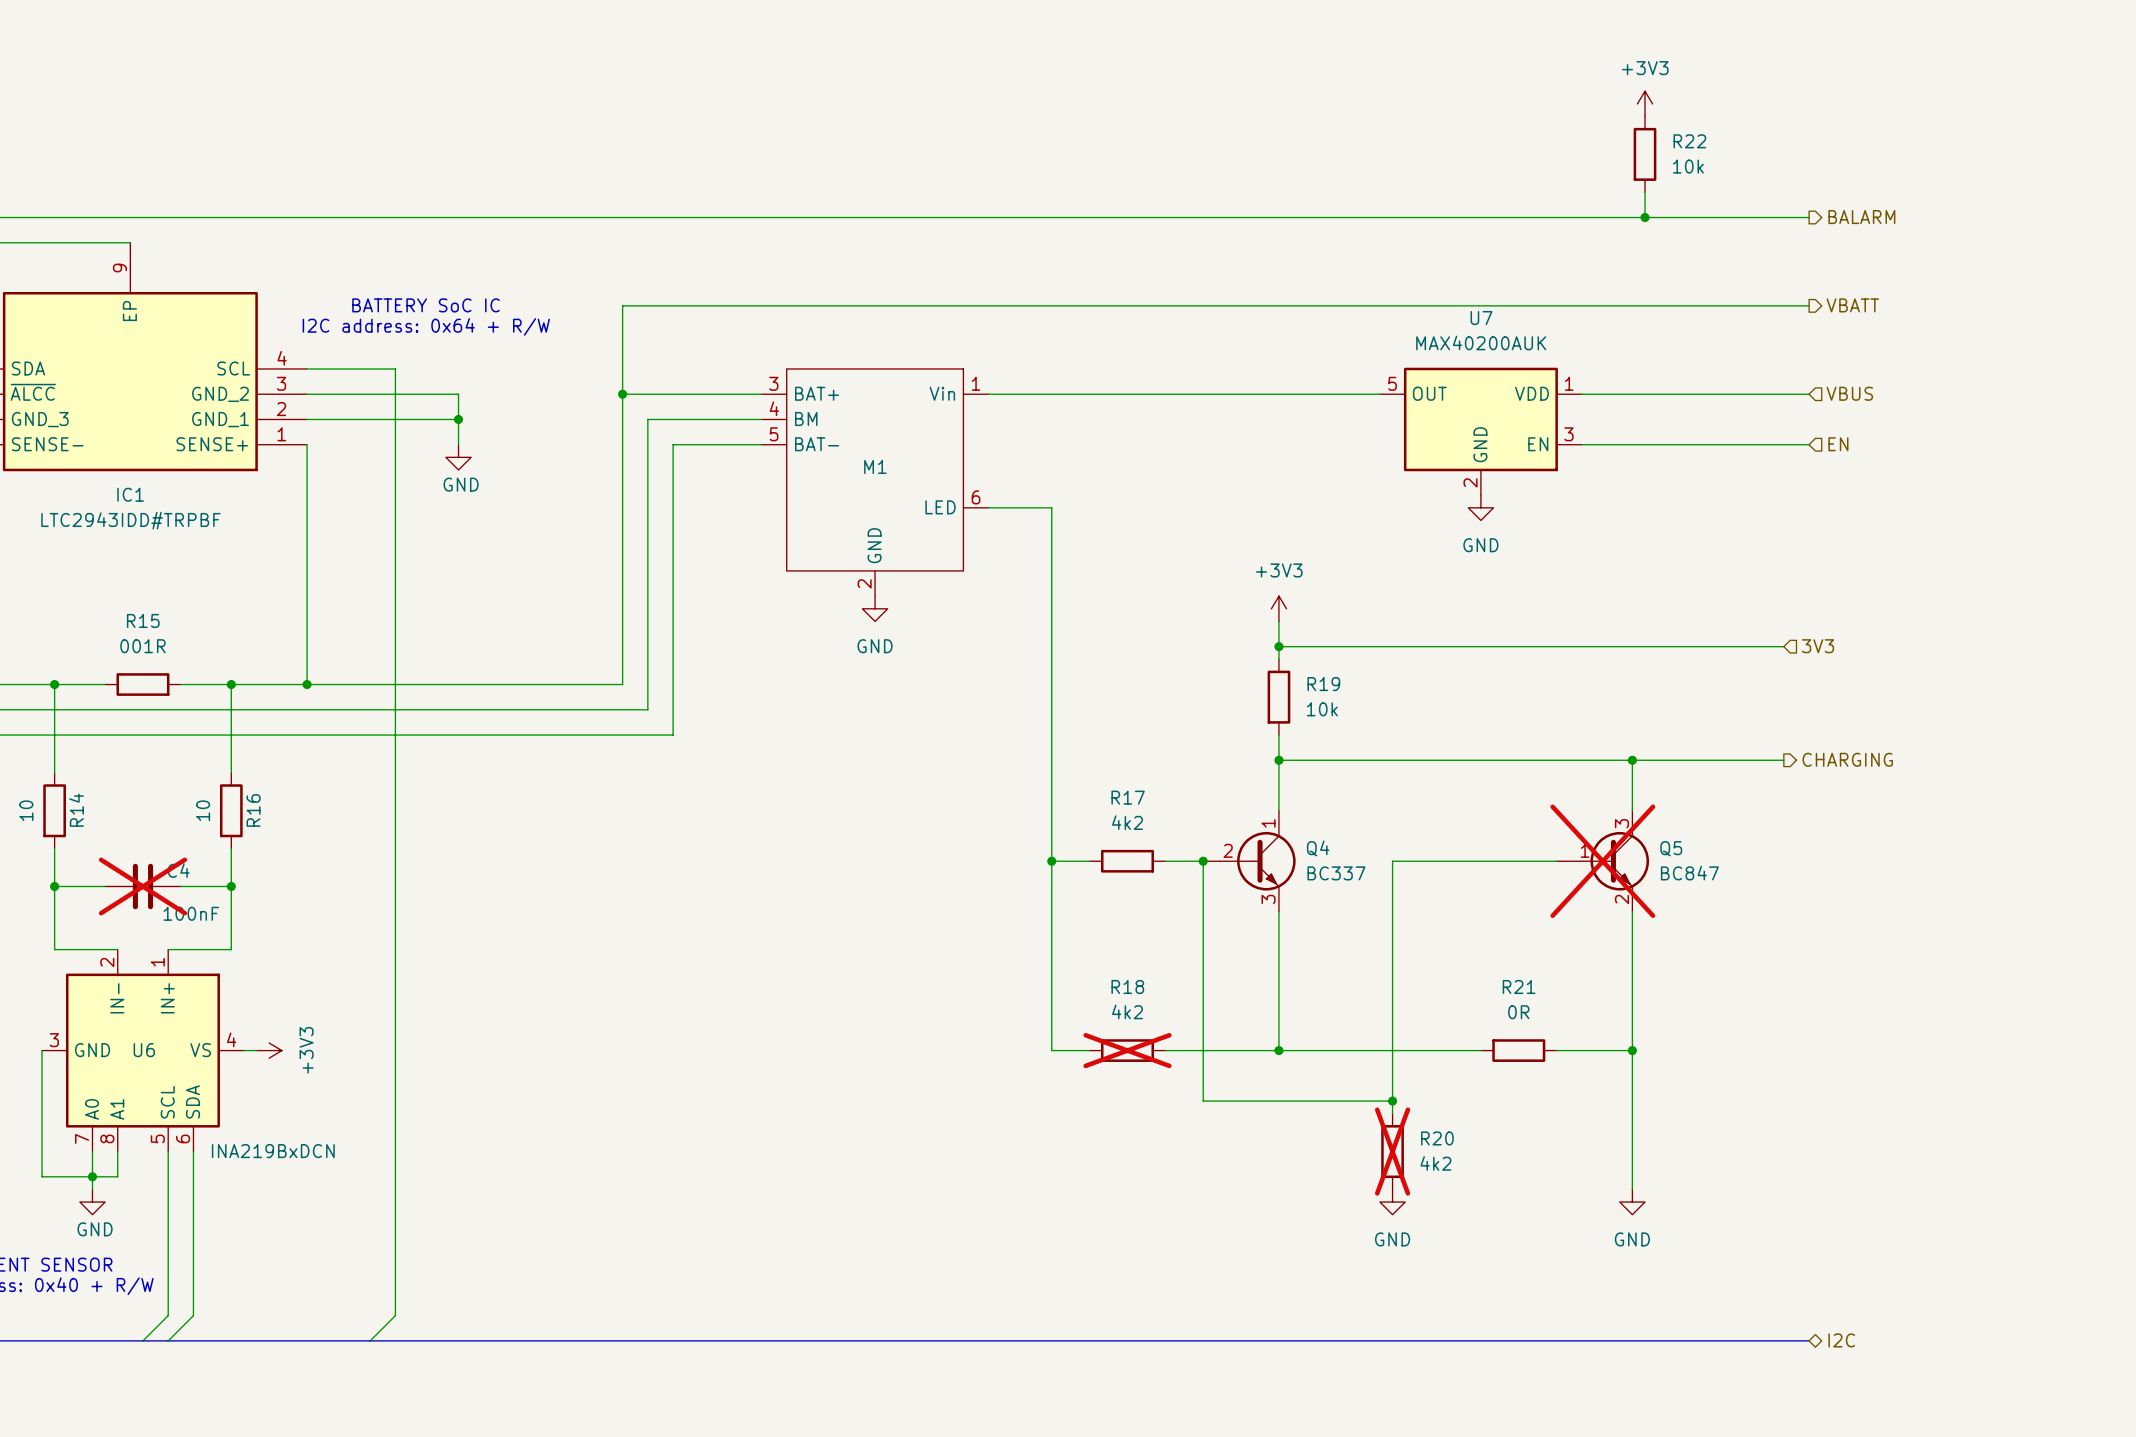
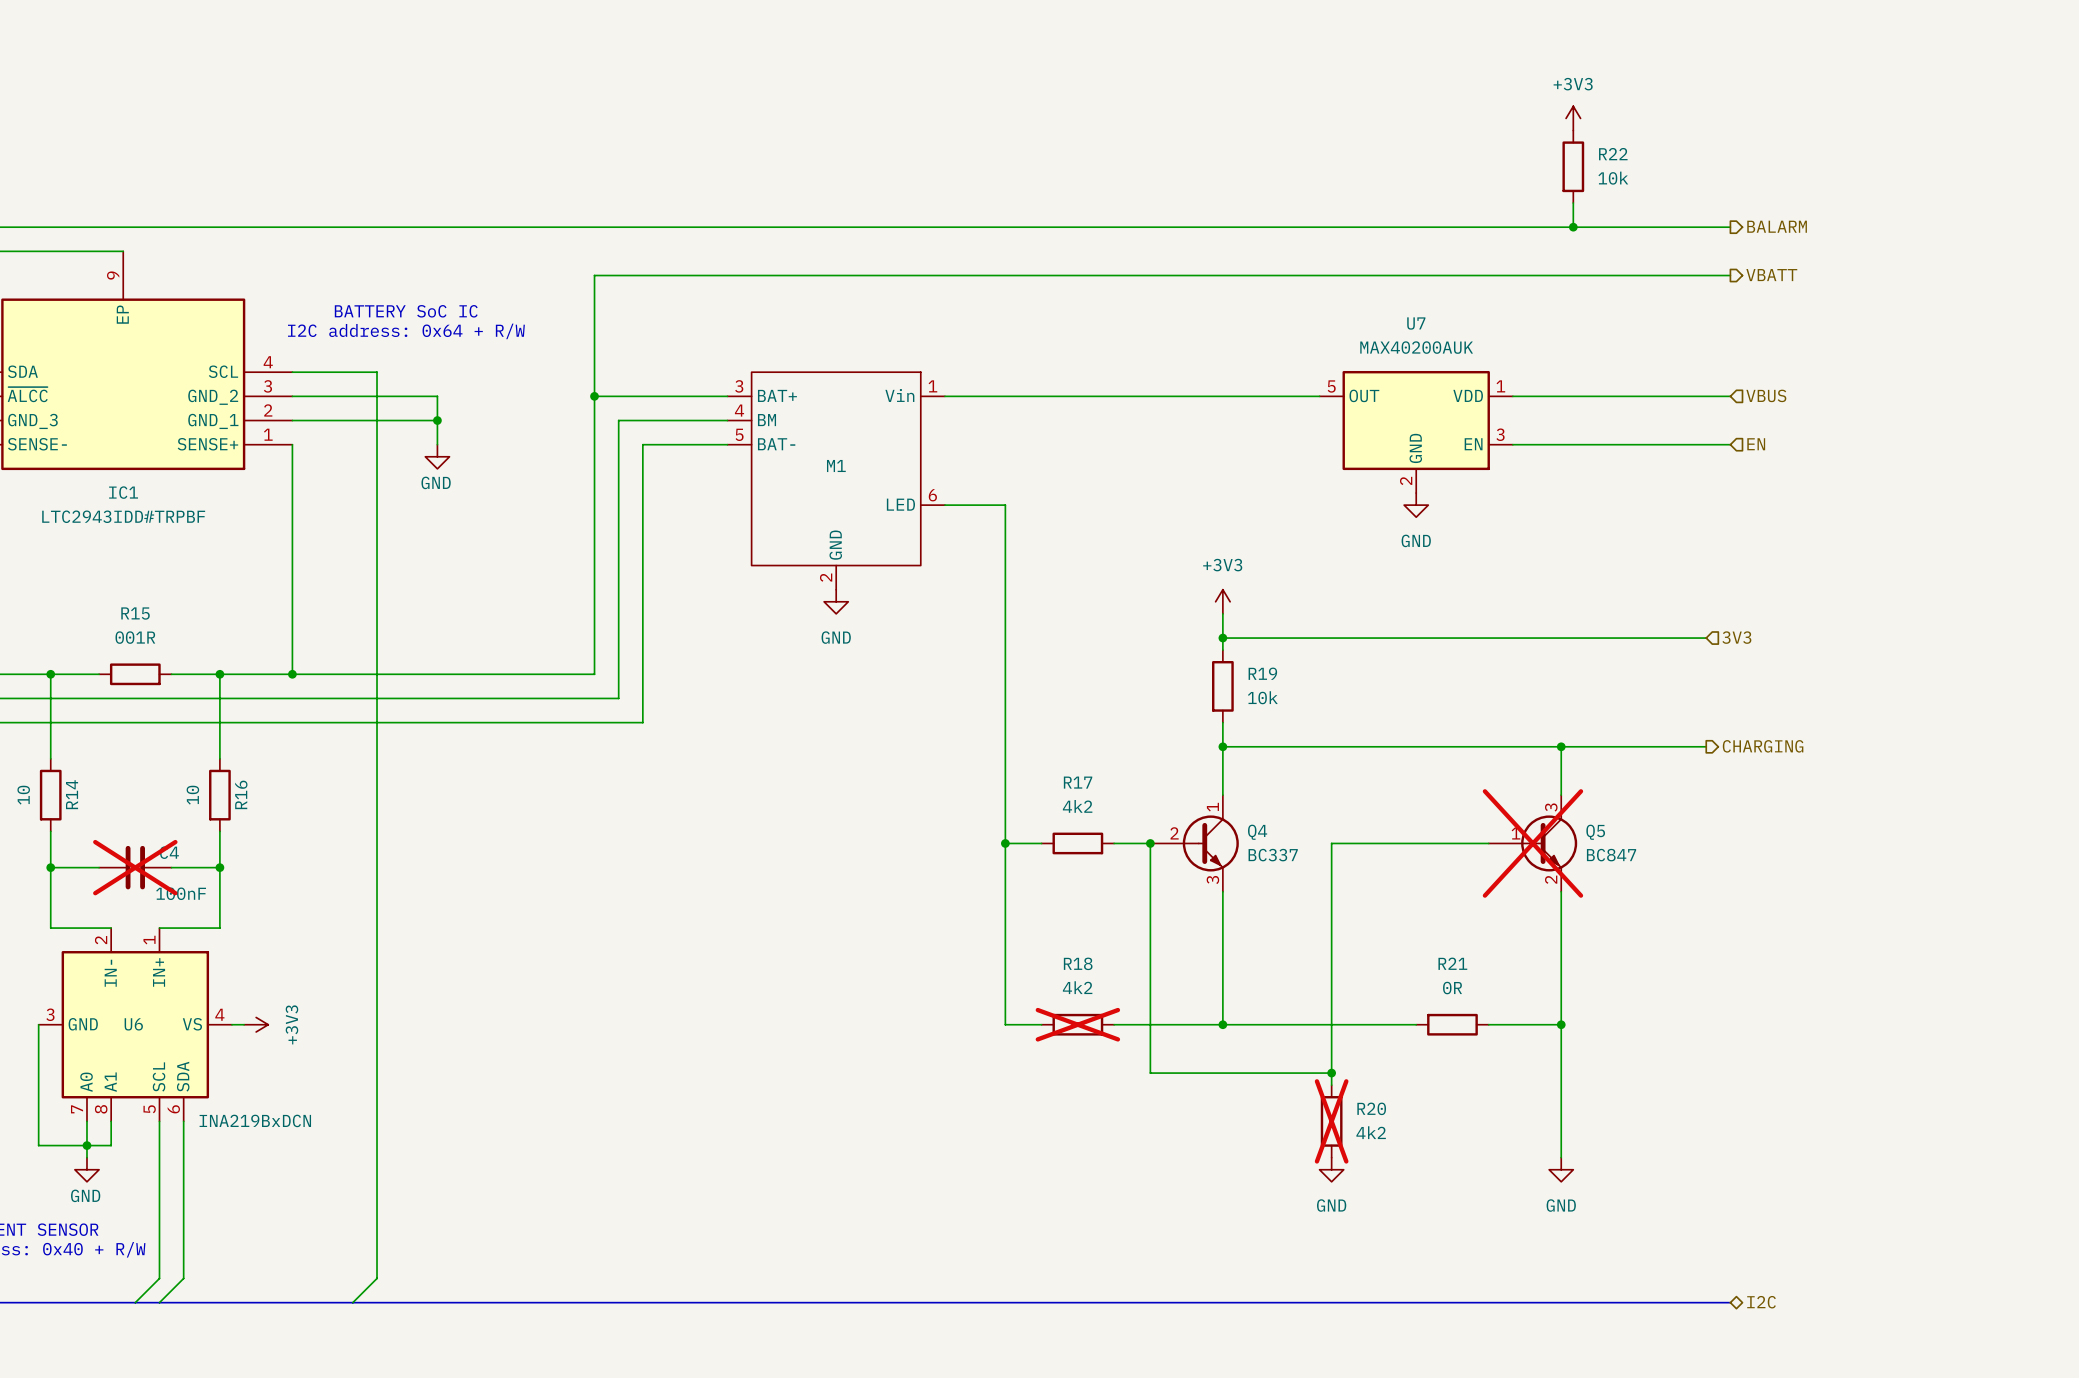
wire: (622, 305) (1809, 305) -> (594, 311) (594, 275) (1730, 275)
hierarchical label position: VBATT (1852, 305) -> VBATT (1771, 275)

